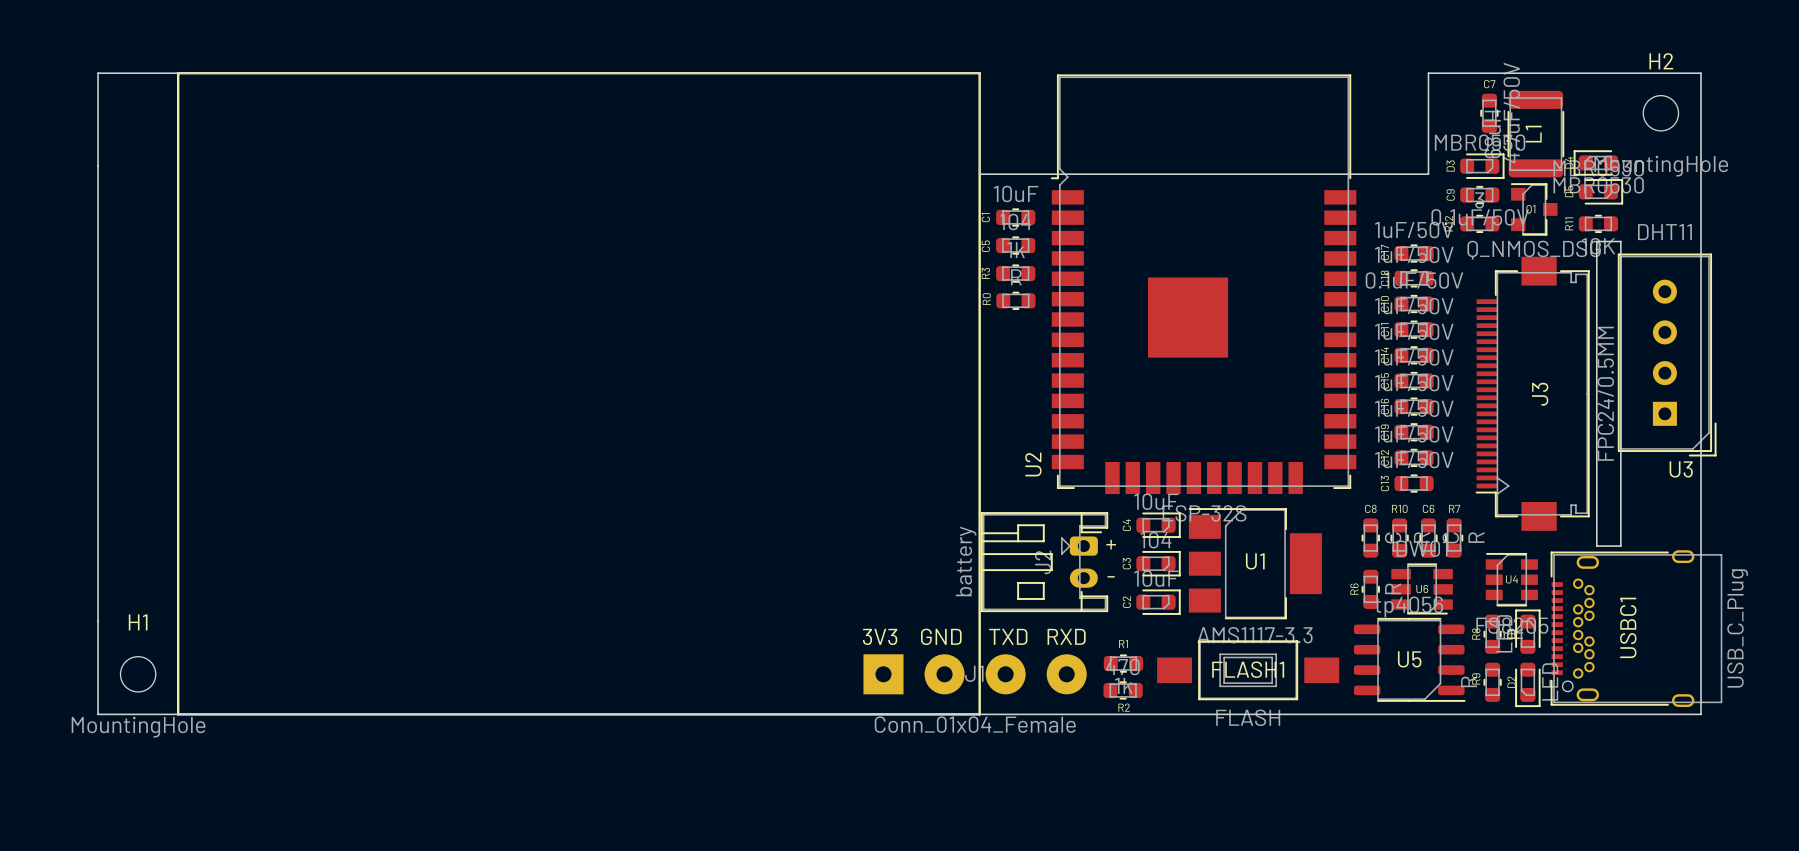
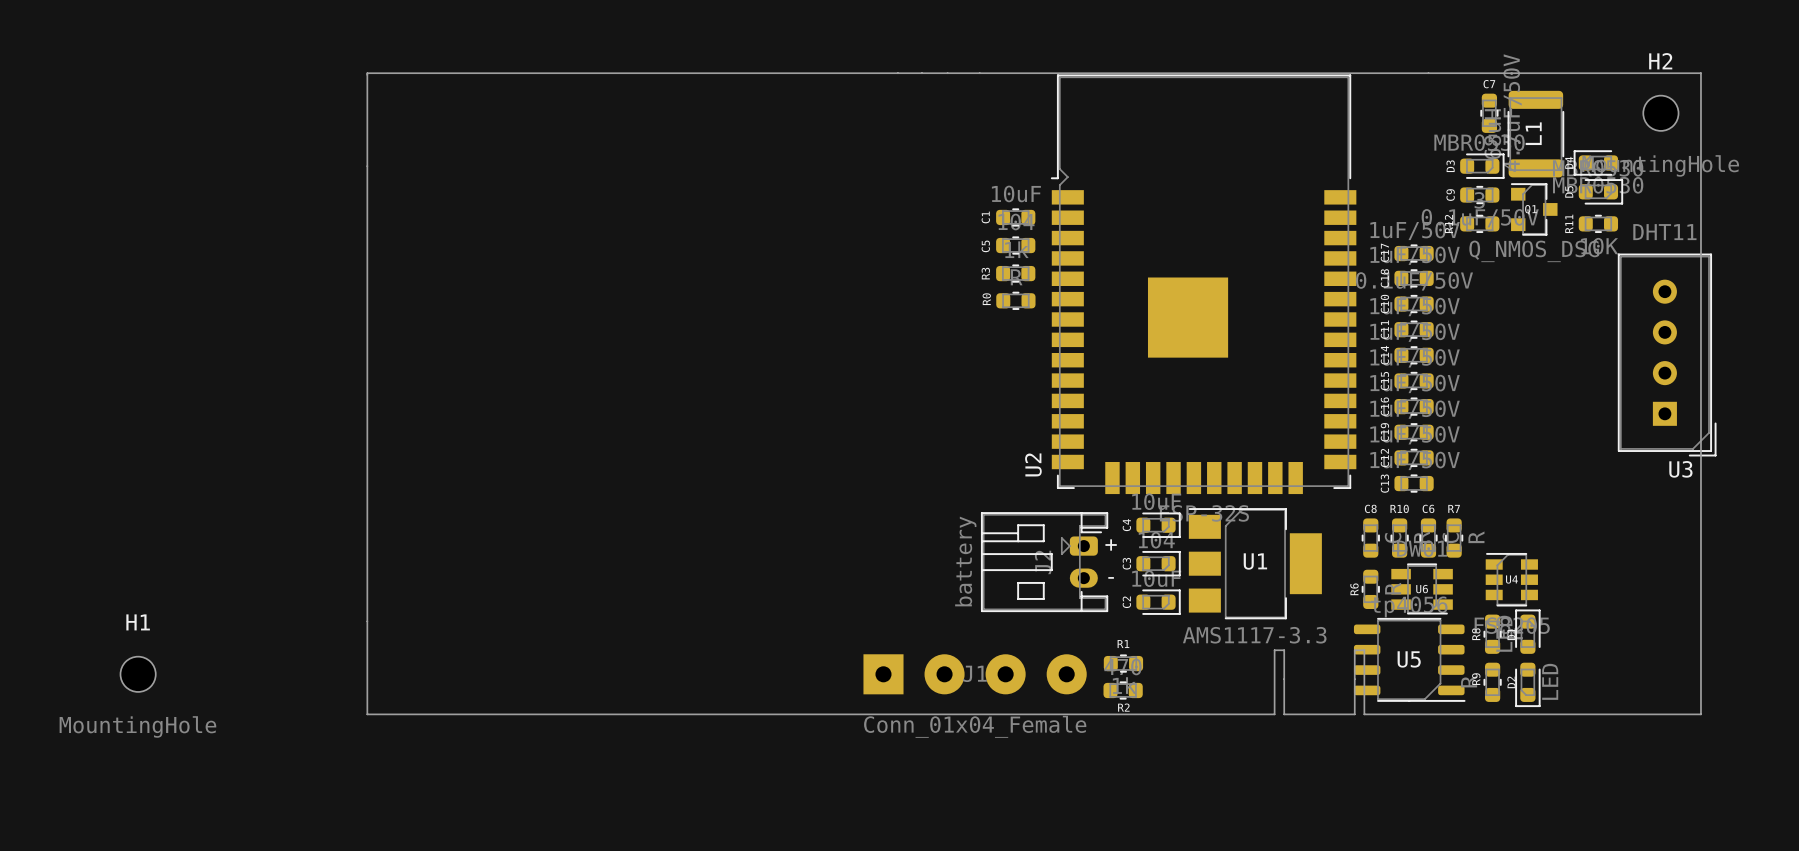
line: (178, 73) (979, 73) (979, 714) (178, 714) (178, 73) -> none
board edge: (367, 73) (98, 73) (98, 714) (367, 714) -> (367, 73) (367, 714)
board edge: (979, 73) (979, 174) (1428, 174) (1428, 73) -> (979, 73) (1428, 73)
board edge: (1596, 241) (1620, 241) (1620, 546) (1596, 546) (1596, 241) -> none
J3: FPC24/0.5MM (1532, 393) -> none
USBC1: USB_C_Plug (1636, 628) -> none
text: 3V3 (880, 636) -> none
text: GND (941, 636) -> none
text: TXD (1008, 636) -> none
text: RXD (1066, 636) -> none
FLASH1: FLASH (1248, 670) -> none
board edge: (1274, 714) (1284, 714) -> (1274, 714) (1274, 650) (1284, 650) (1284, 714)
board edge: (1354, 714) (1364, 714) -> (1354, 714) (1354, 650) (1364, 650) (1364, 714)

